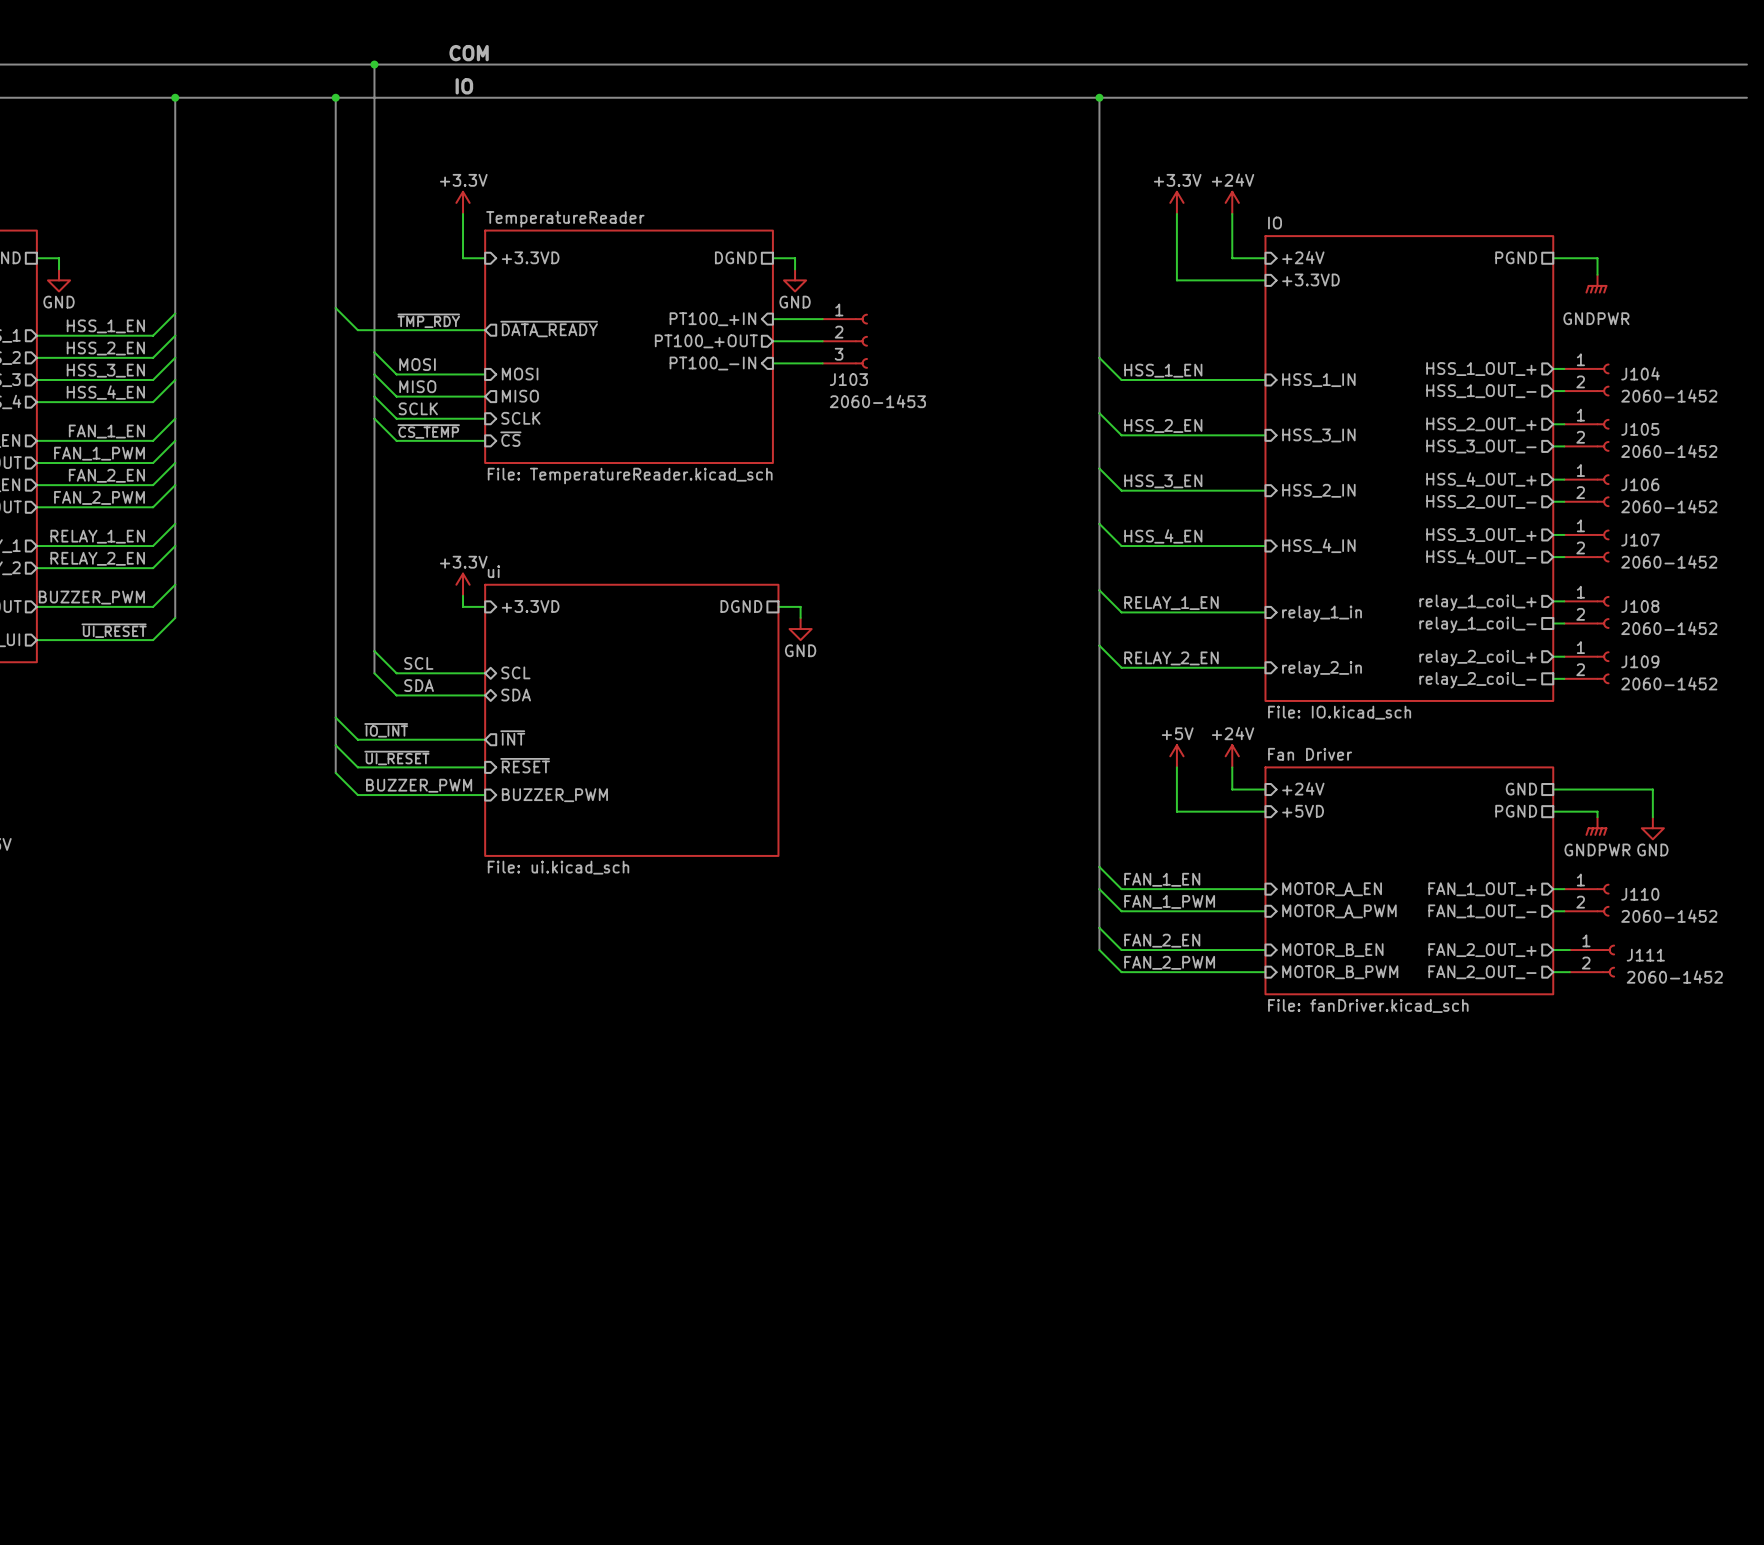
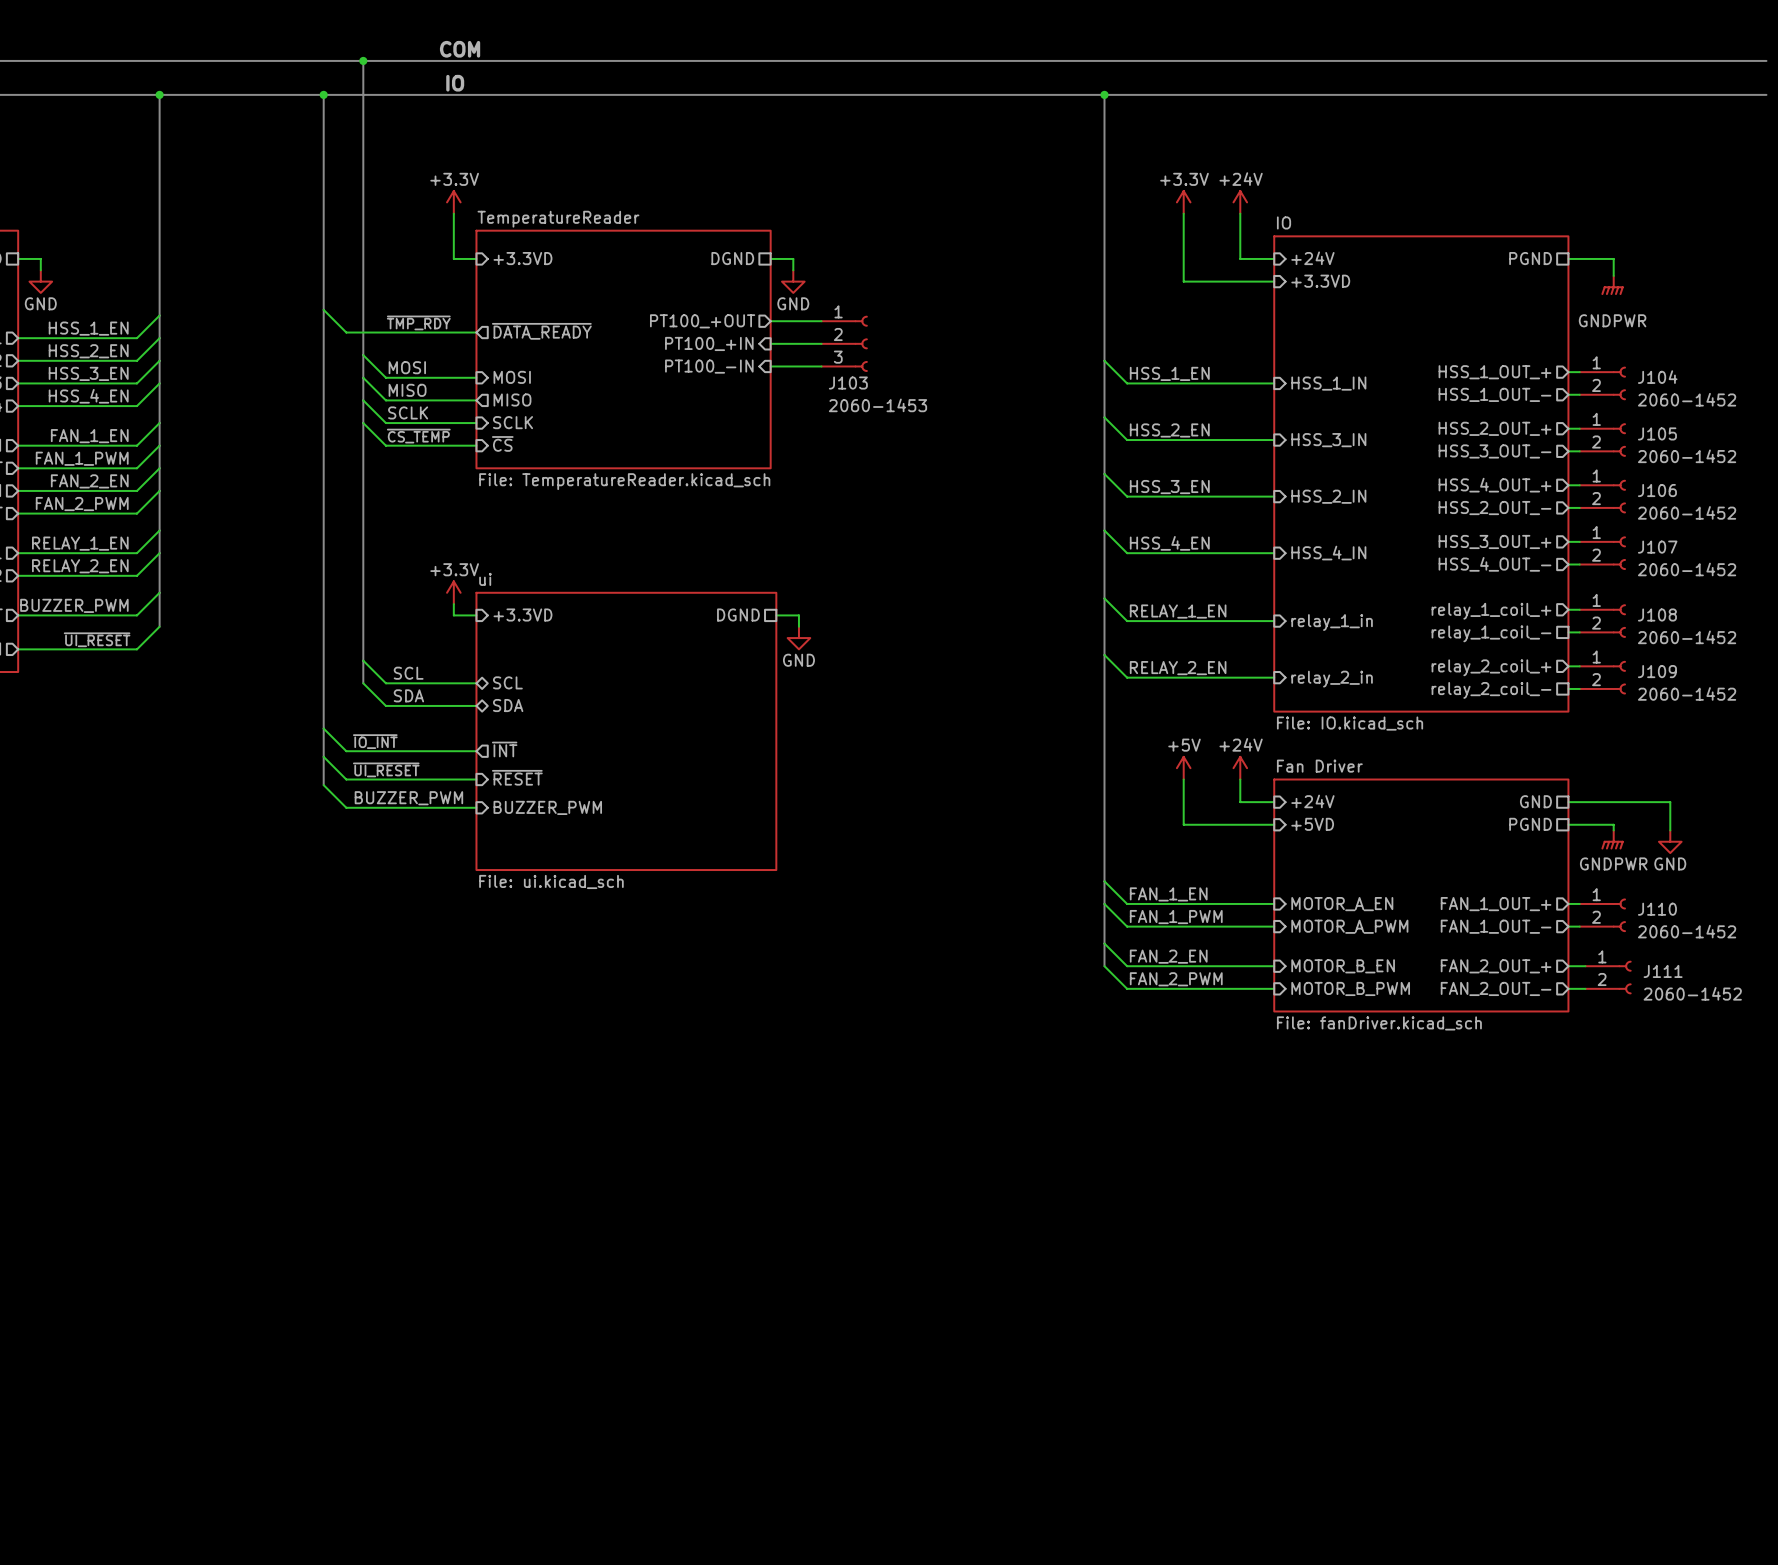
sheet pin shape: input (712, 319) -> output (702, 321)
sheet pin: PT100_+IN (712, 319) -> PT100_+OUT (702, 321)
sheet pin shape: output (706, 341) -> input (709, 343)
sheet pin: PT100_+OUT (706, 341) -> PT100_+IN (709, 343)

